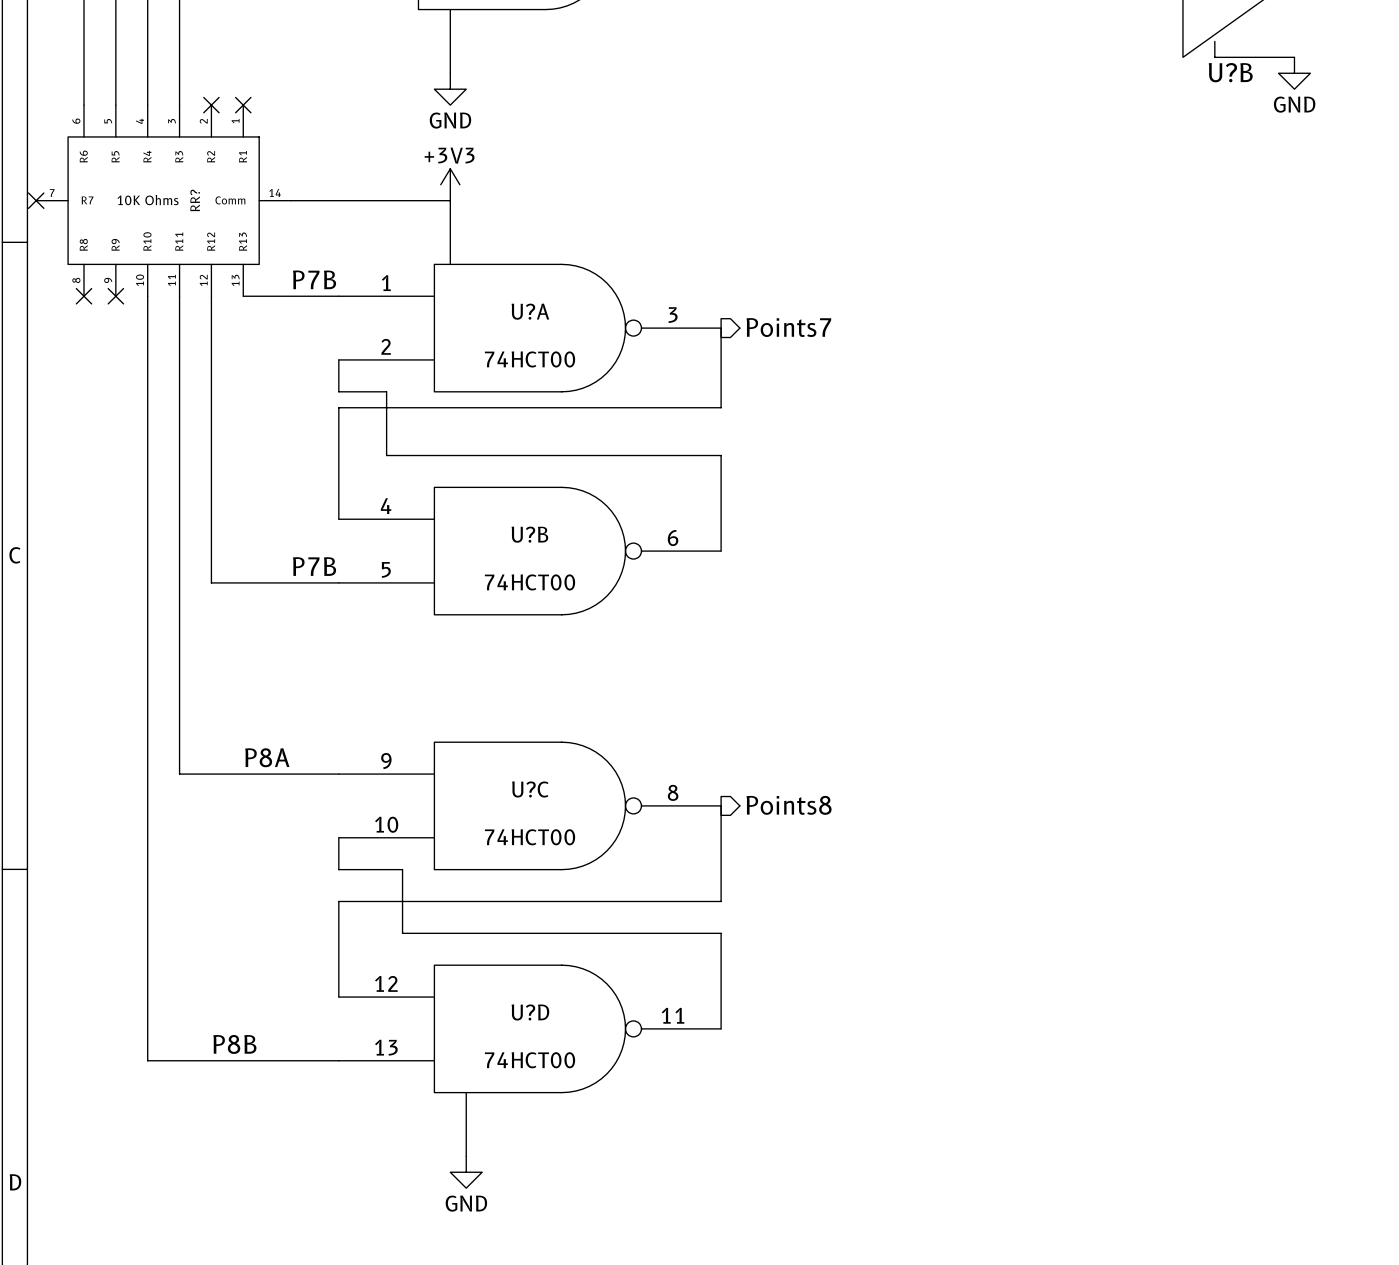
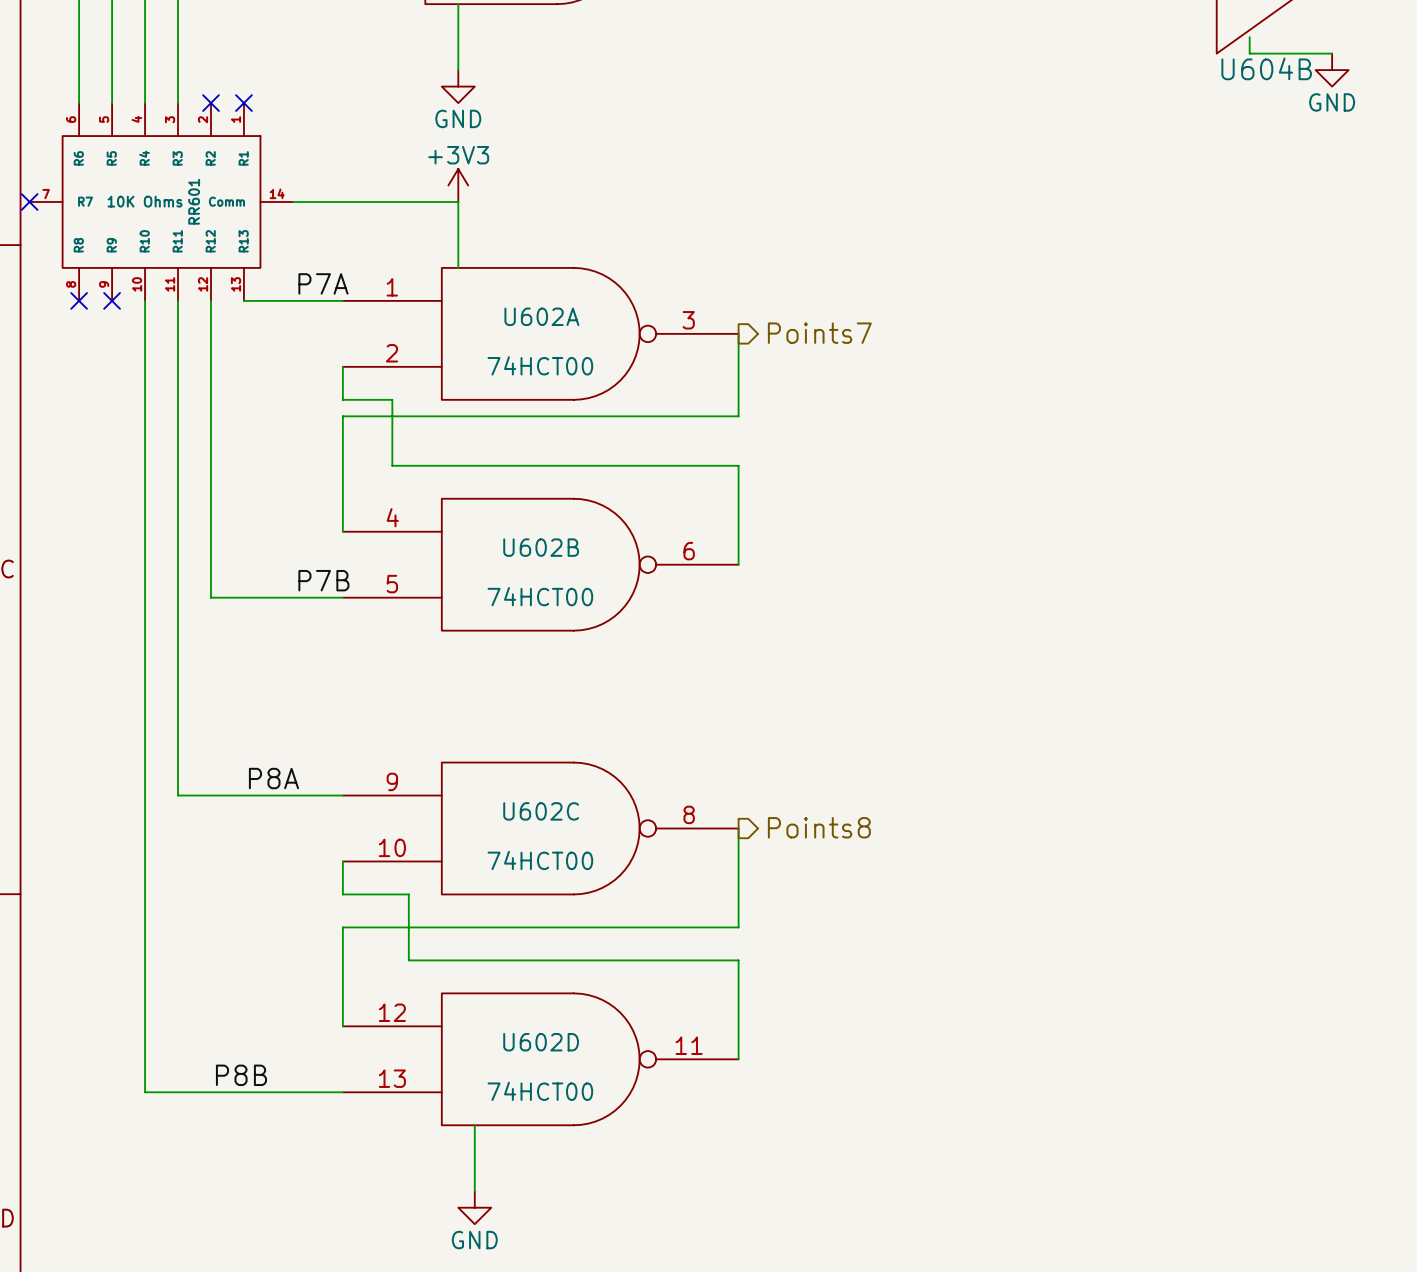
U?B name: U?B (1230, 72) -> U604B (1266, 68)
RR? name: RR? (195, 200) -> RR601 (194, 201)
label: P7B (314, 279) -> P7A (323, 283)
U?A name: U?A (530, 311) -> U602A (541, 316)
U?B name: U?B (529, 534) -> U602B (541, 547)
U?C name: U?C (530, 789) -> U602C (541, 811)
U?D name: U?D (530, 1012) -> U602D (541, 1042)

